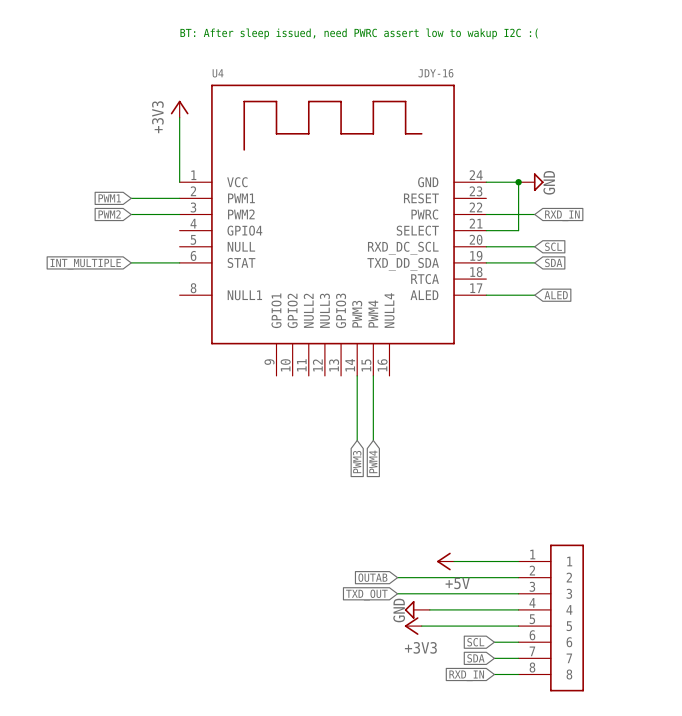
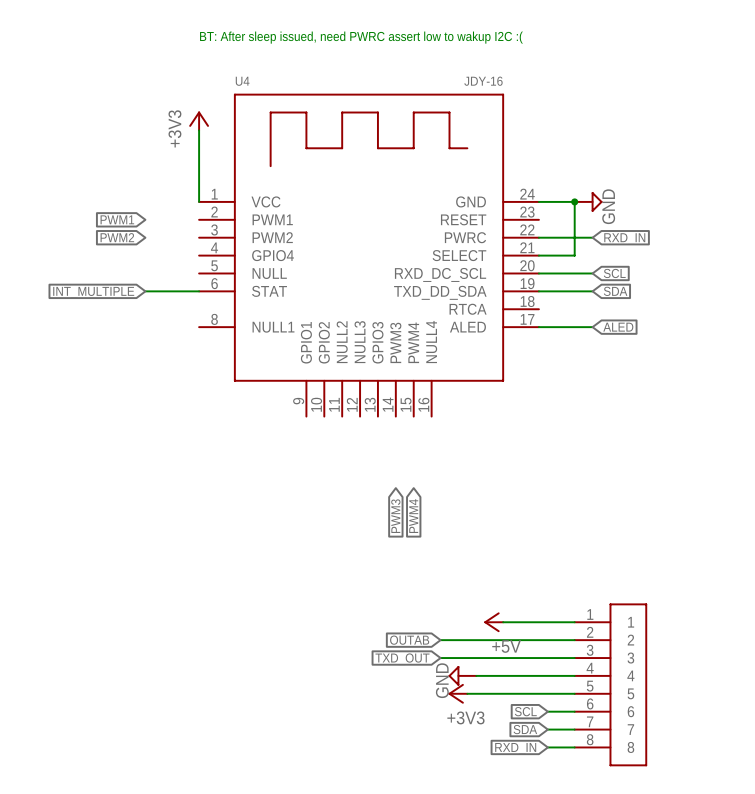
wire: (131, 198) (179, 198) -> none
wire: (131, 214) (179, 214) -> none
wire: (357, 375) (357, 440) -> none
wire: (373, 375) (373, 440) -> none

